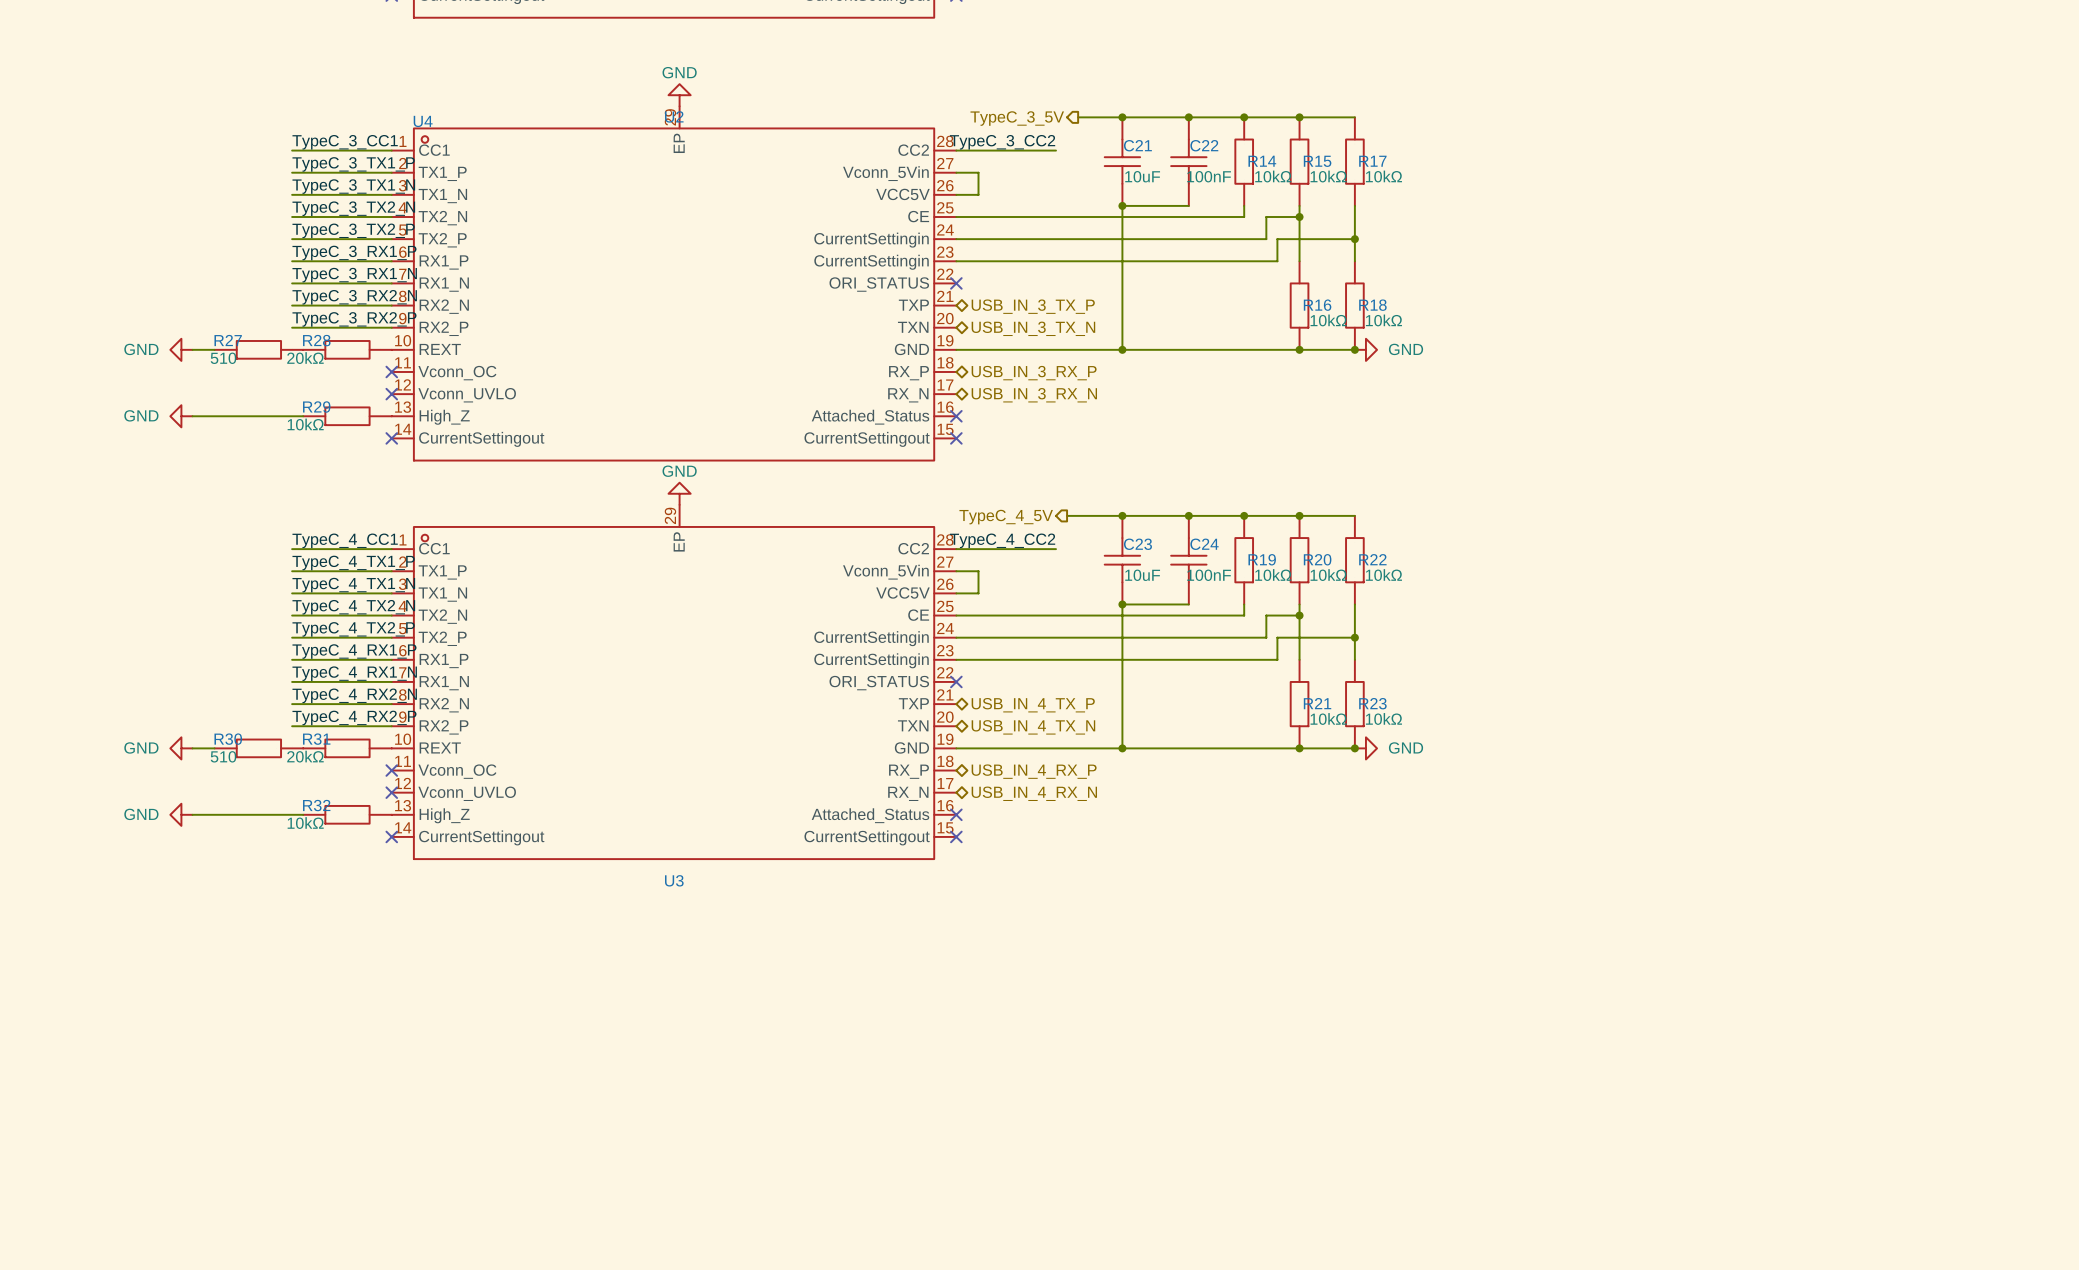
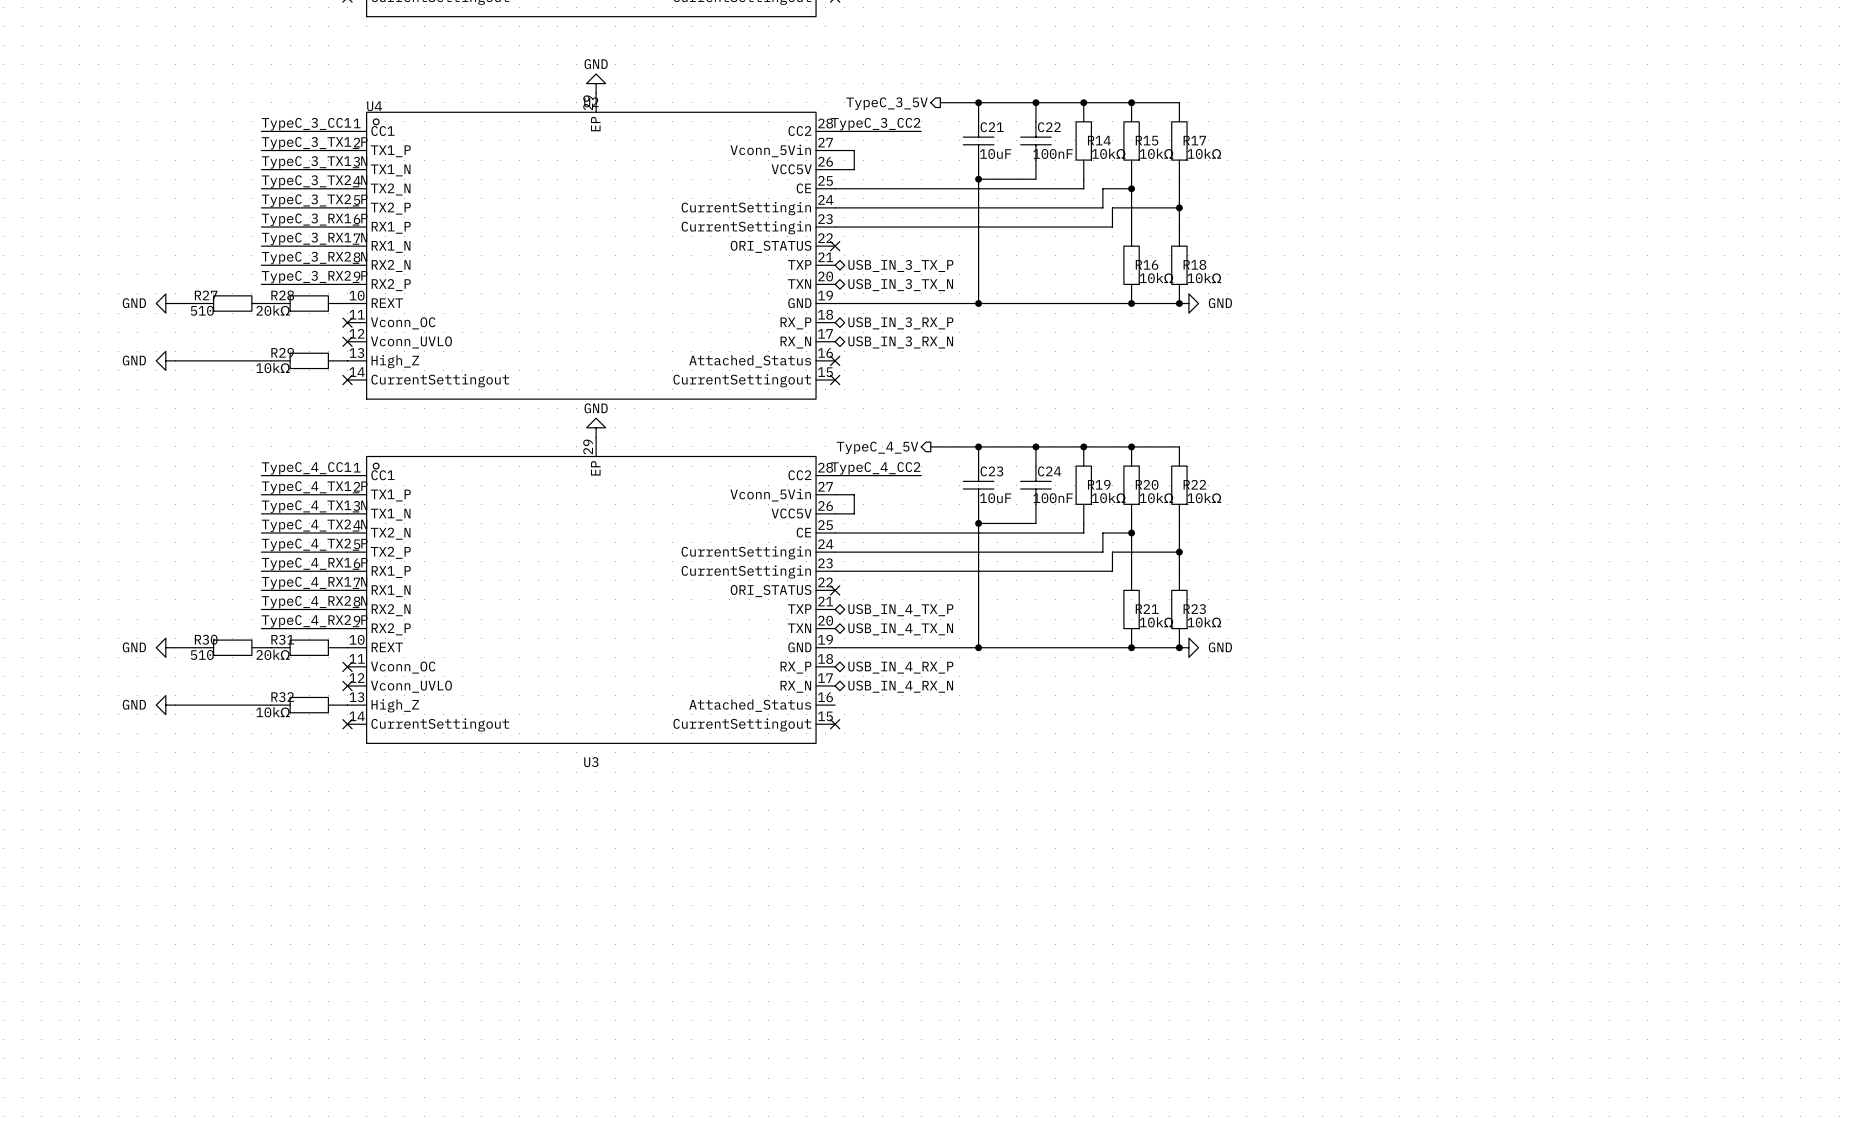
no-connect mark: (956, 814) -> none

